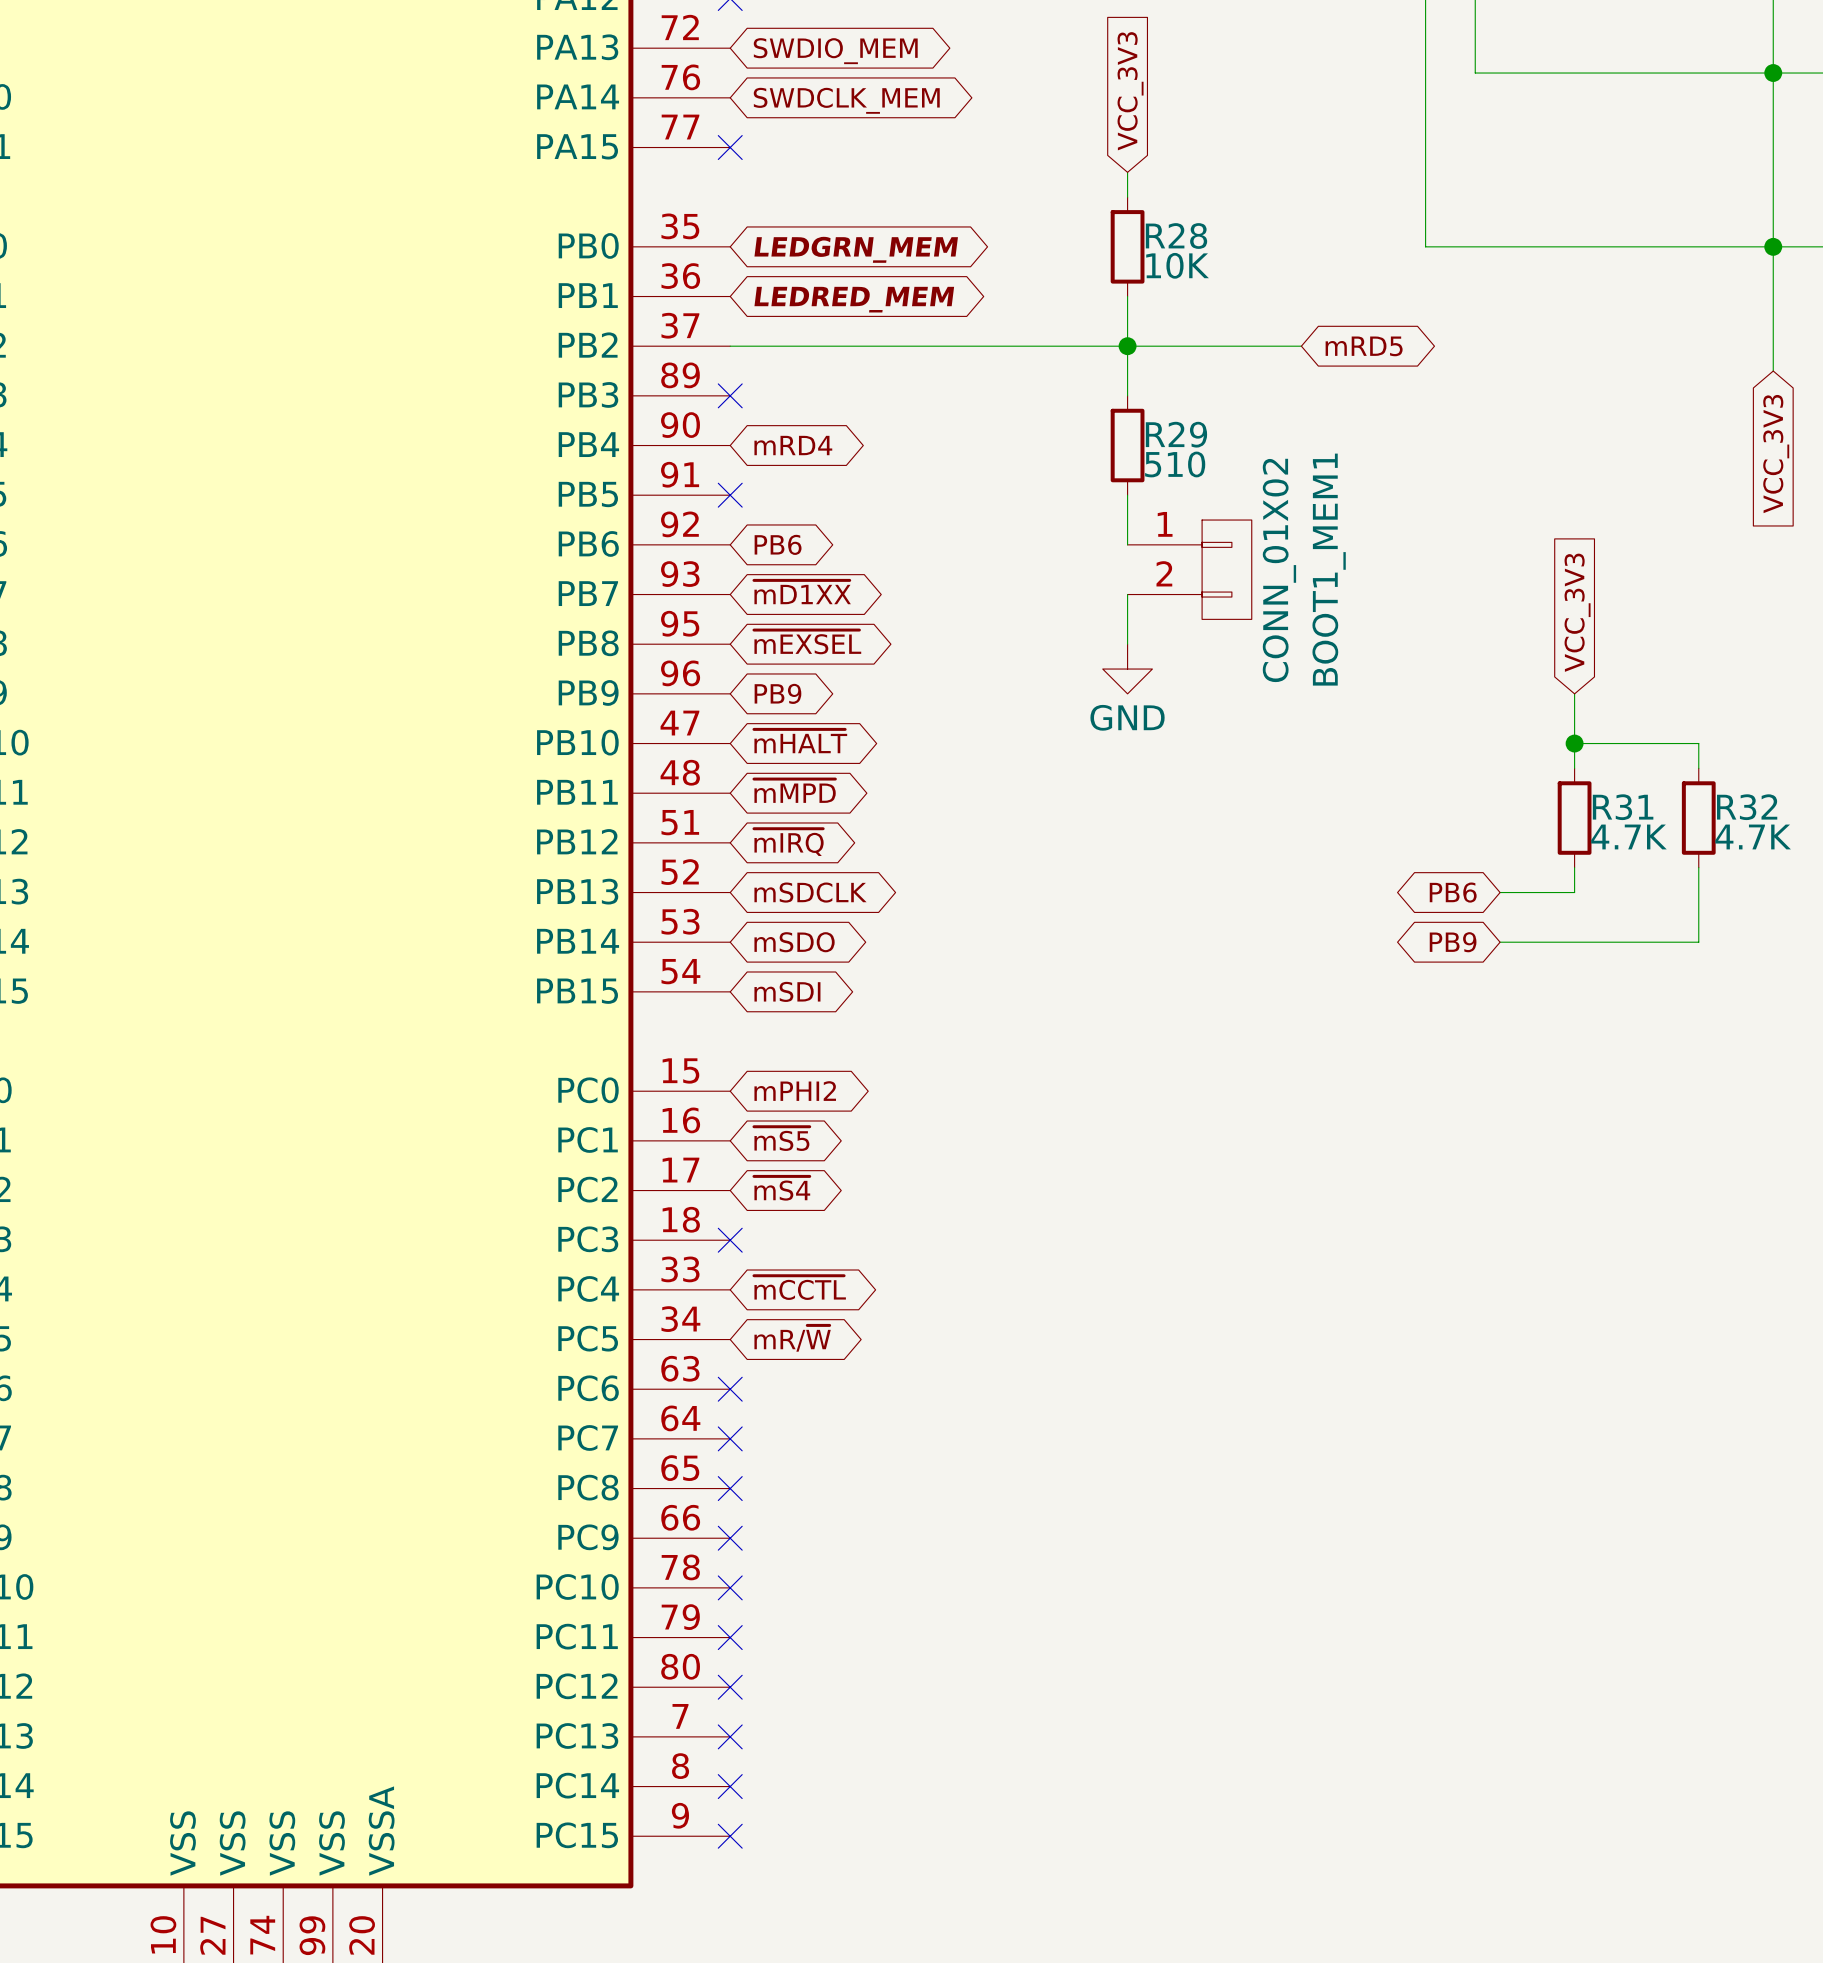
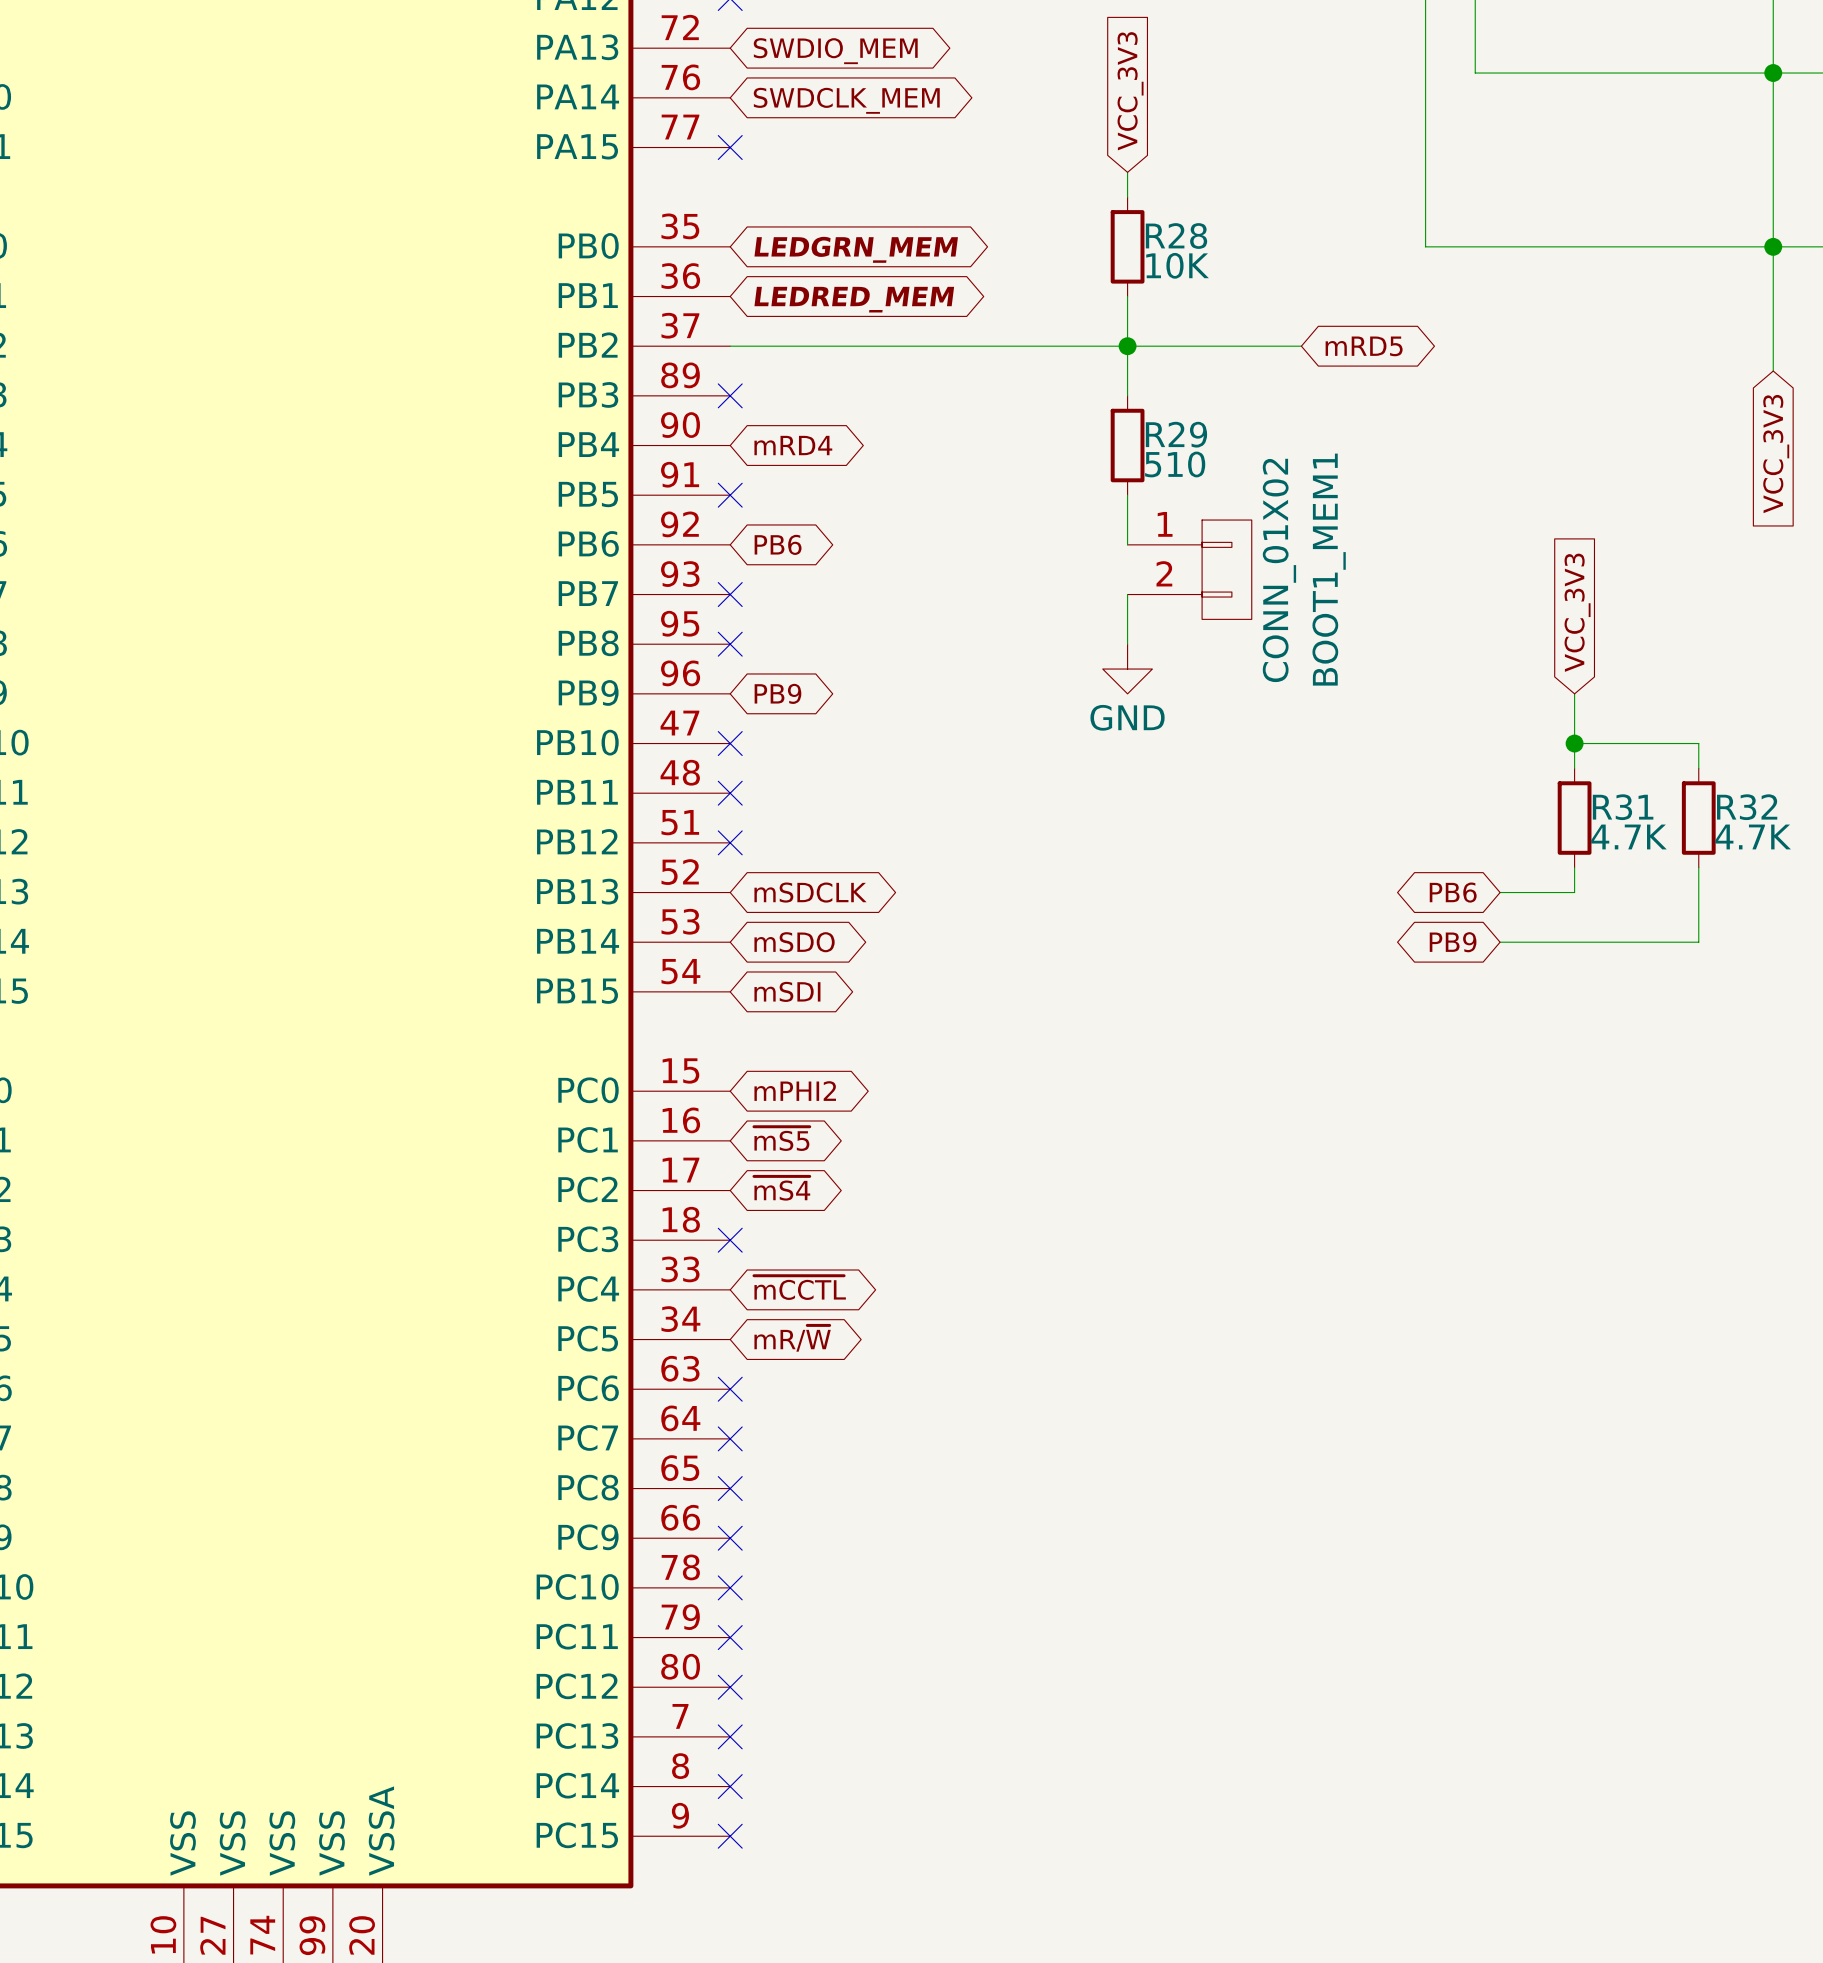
global label: ~{mD1XX} (802, 592) -> none
no-connect mark: none -> (730, 594)
global label: ~{mEXSEL} (807, 642) -> none
no-connect mark: none -> (730, 644)
global label: ~{mHALT} (800, 741) -> none
no-connect mark: none -> (730, 743)
global label: ~{mMPD} (794, 790) -> none
no-connect mark: none -> (730, 793)
no-connect mark: none -> (730, 842)
global label: ~{mIRQ} (788, 842) -> none

